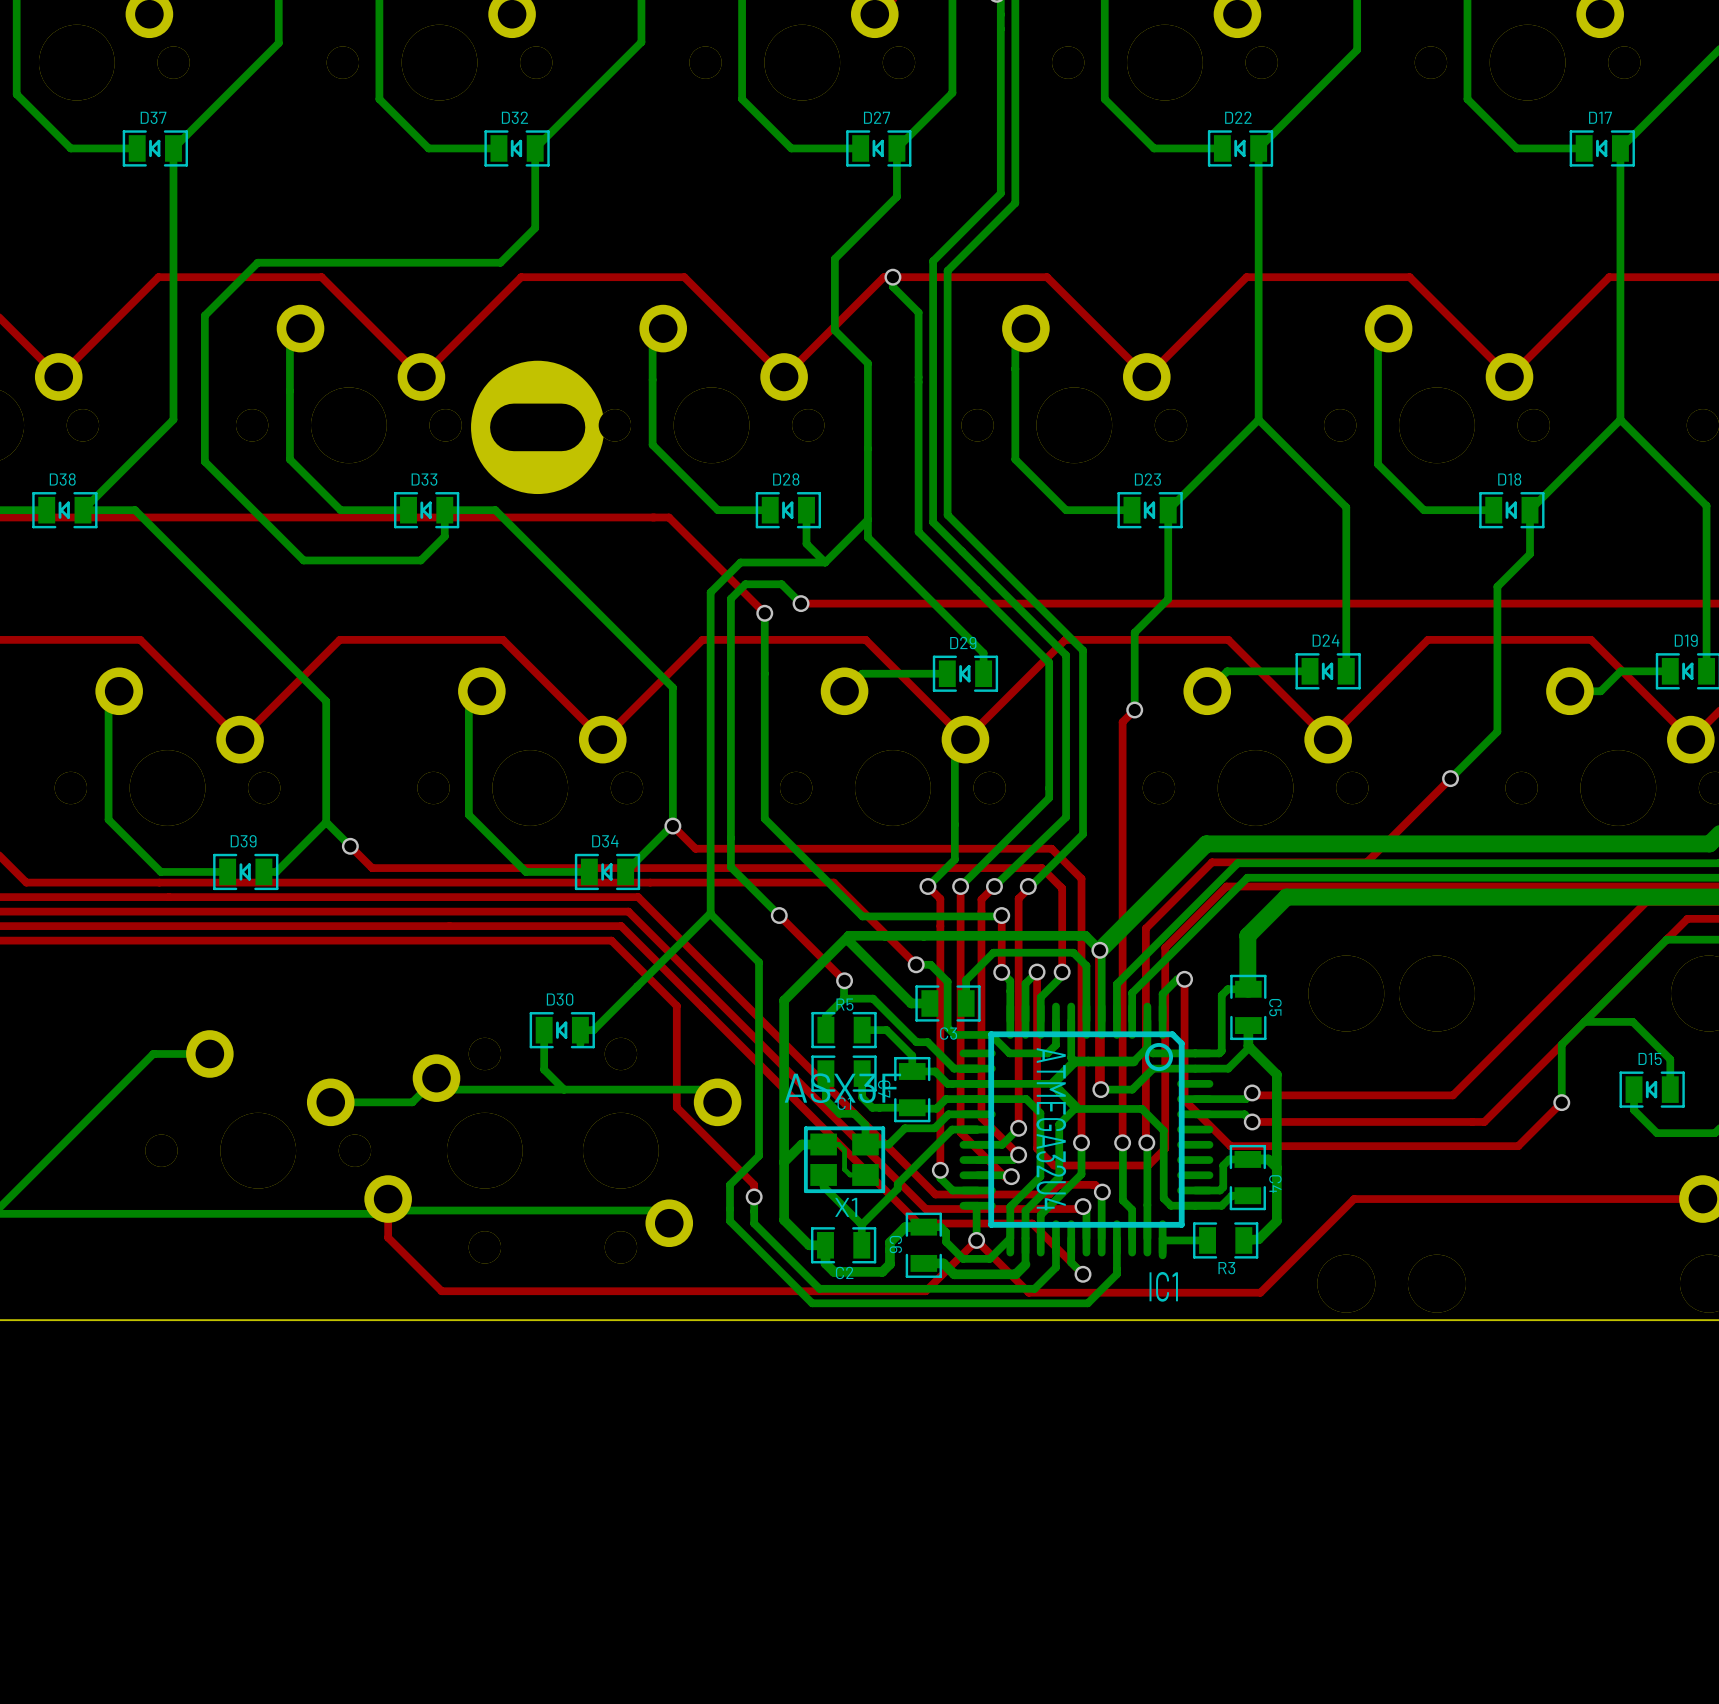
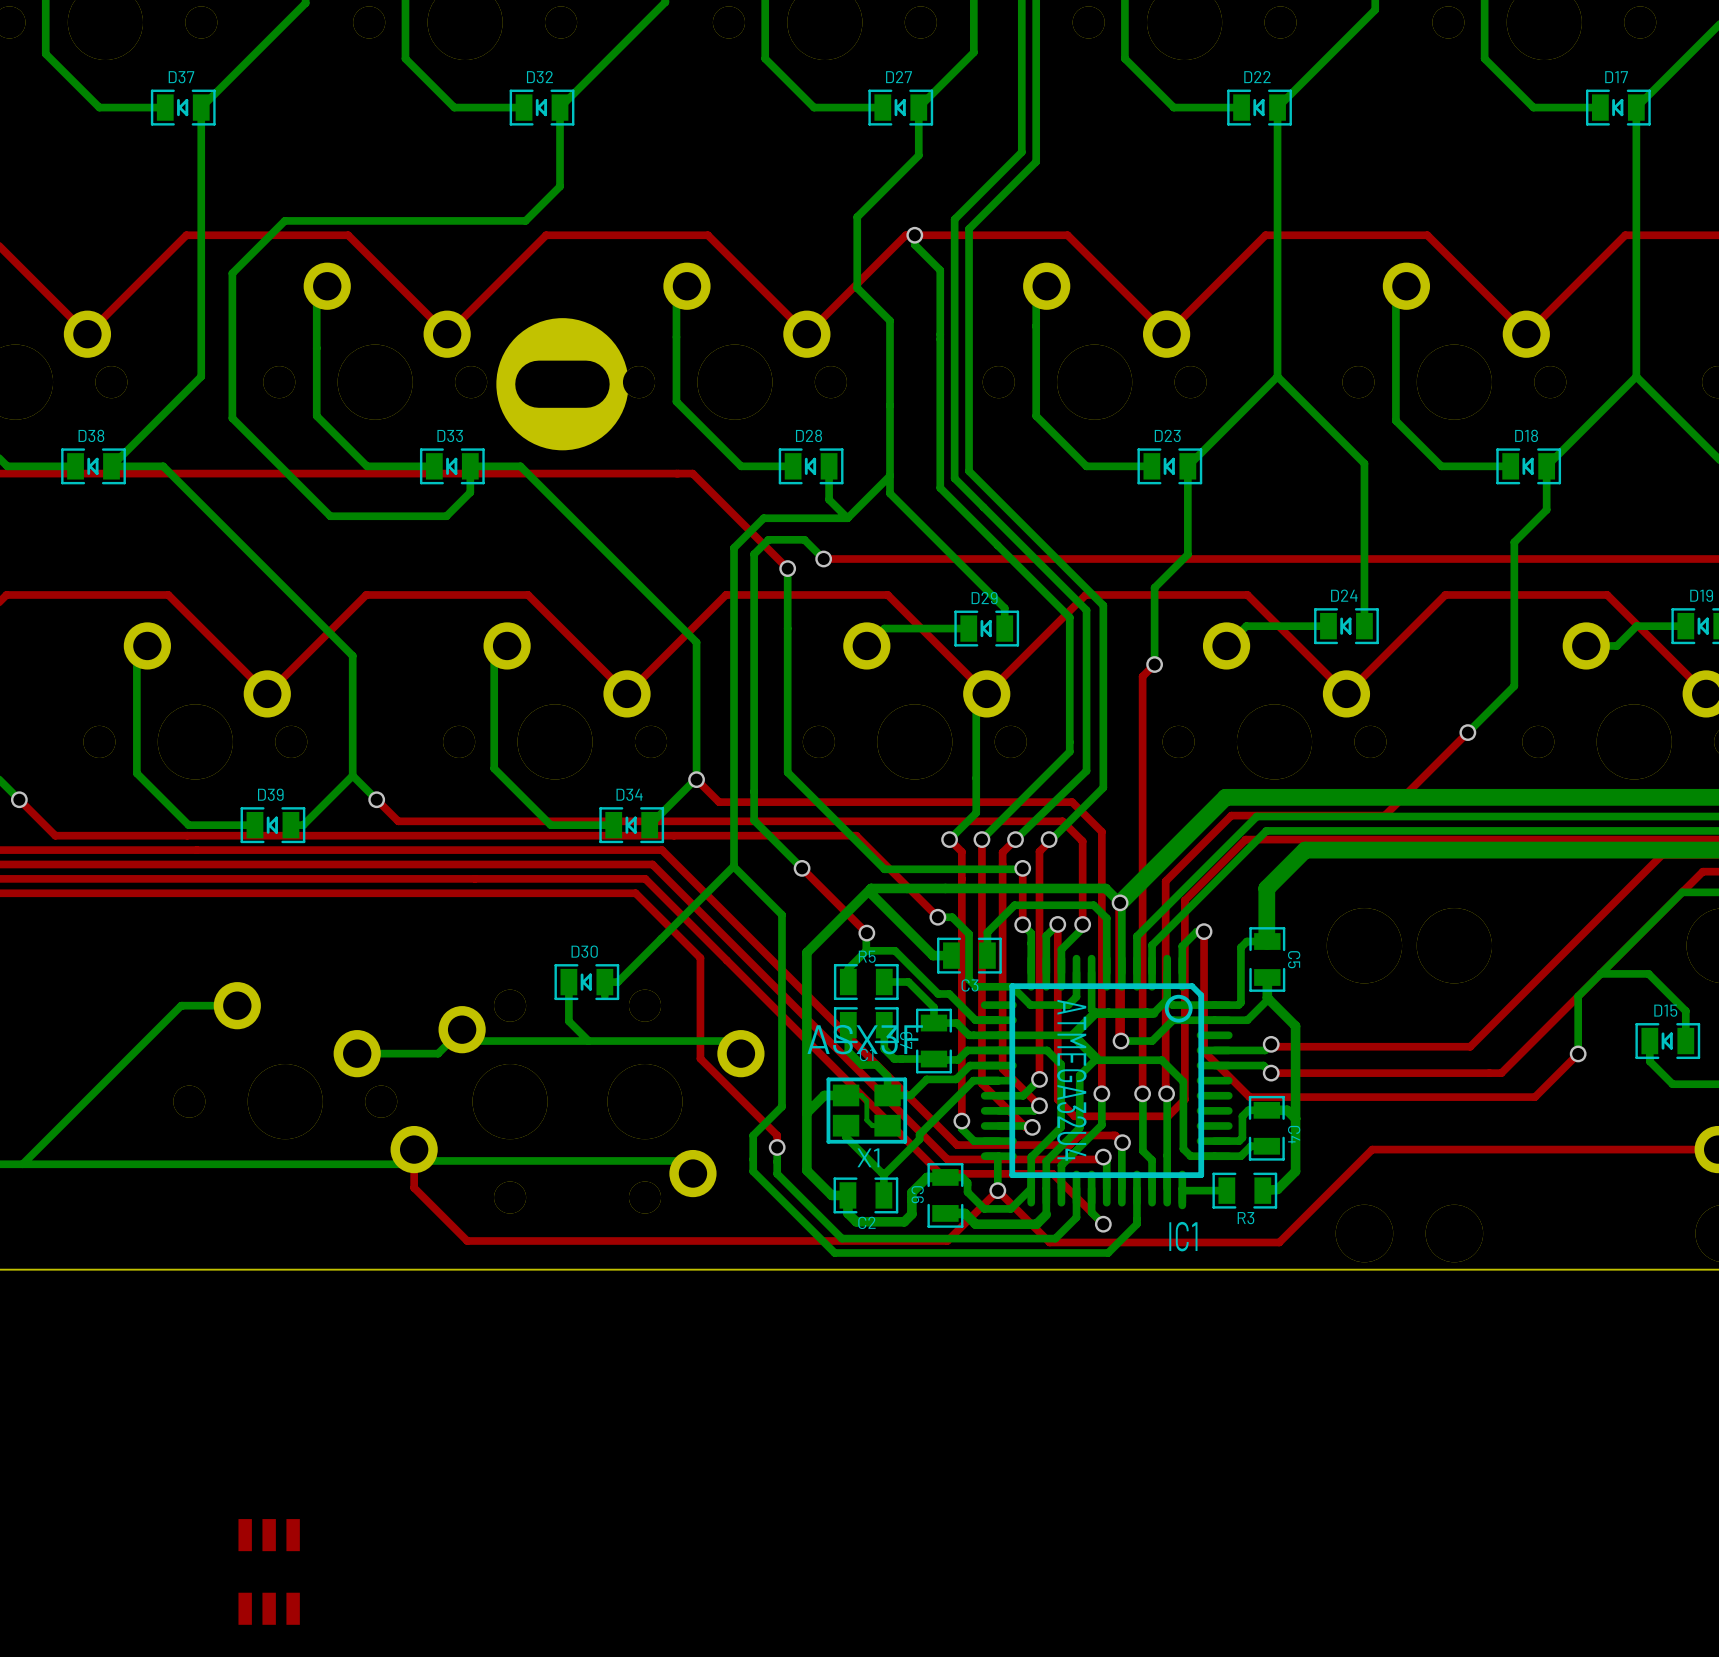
part: none -> (269, 1571)

